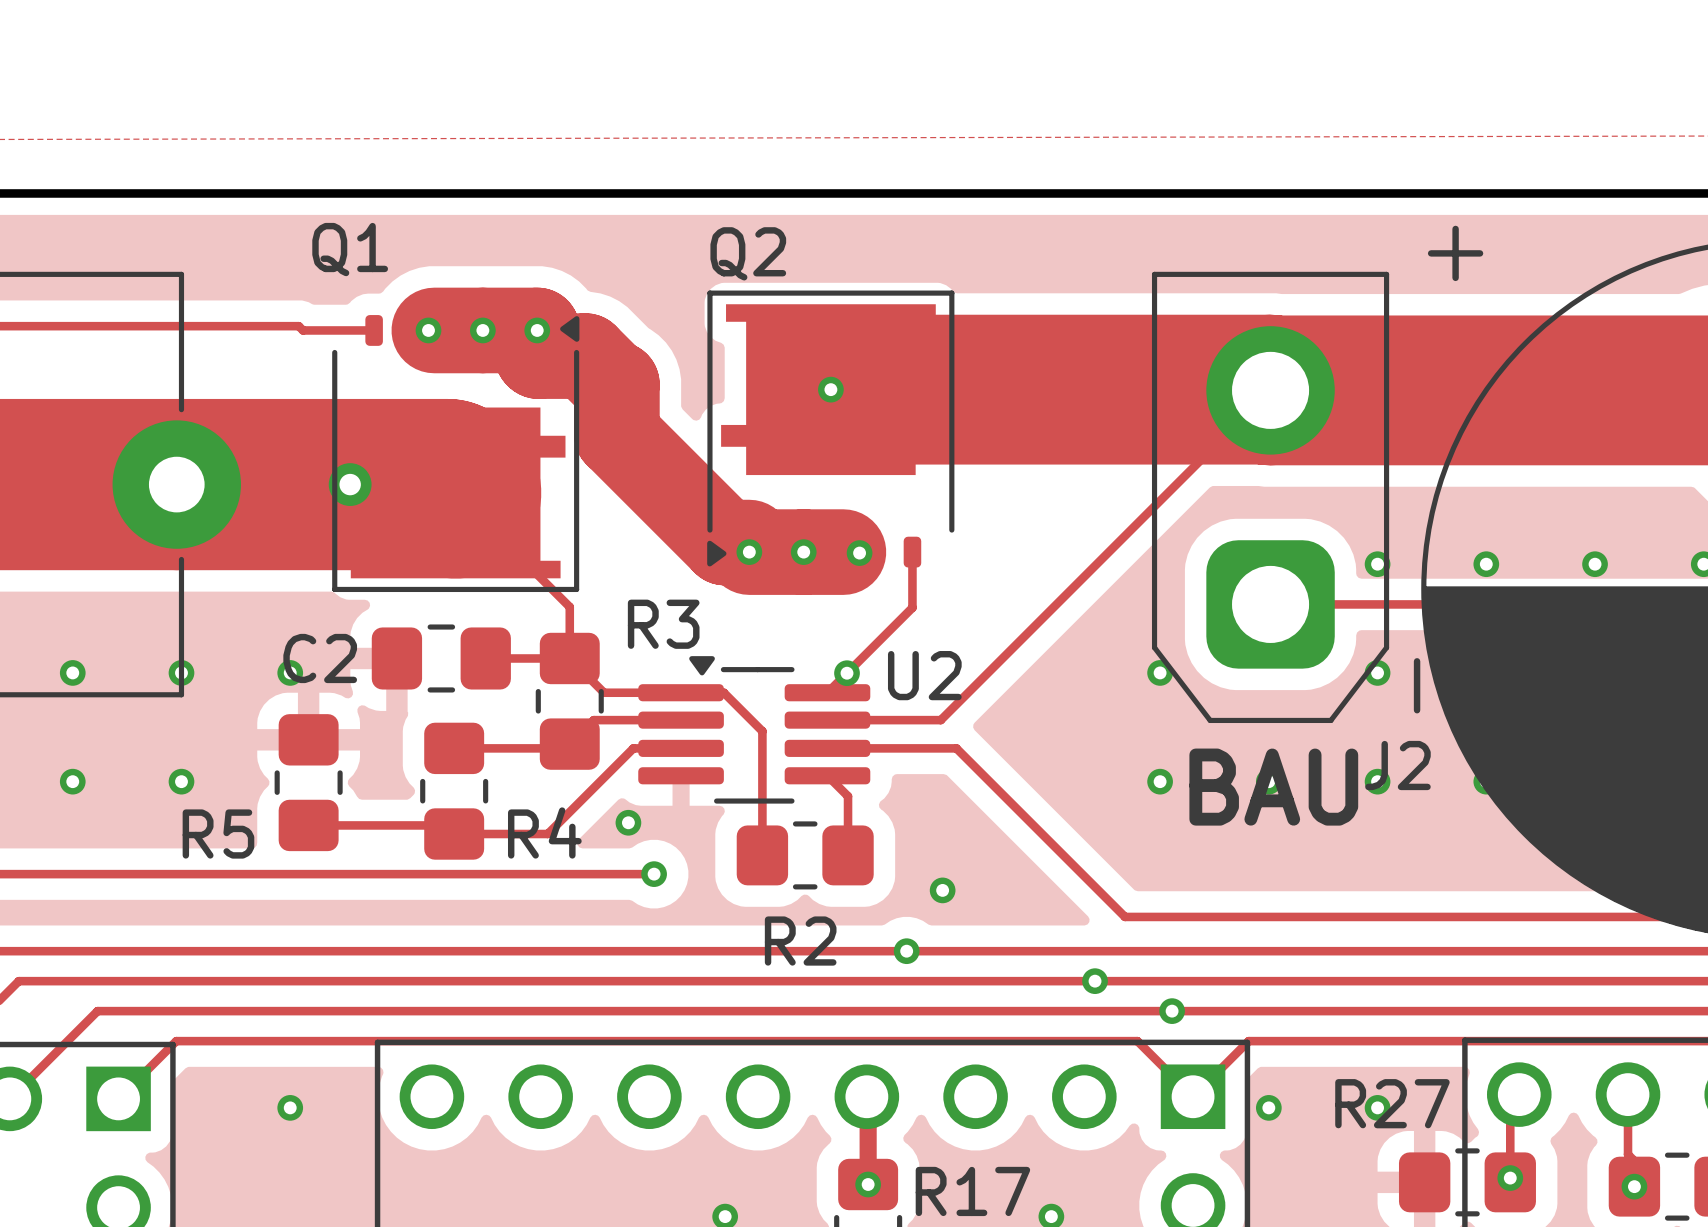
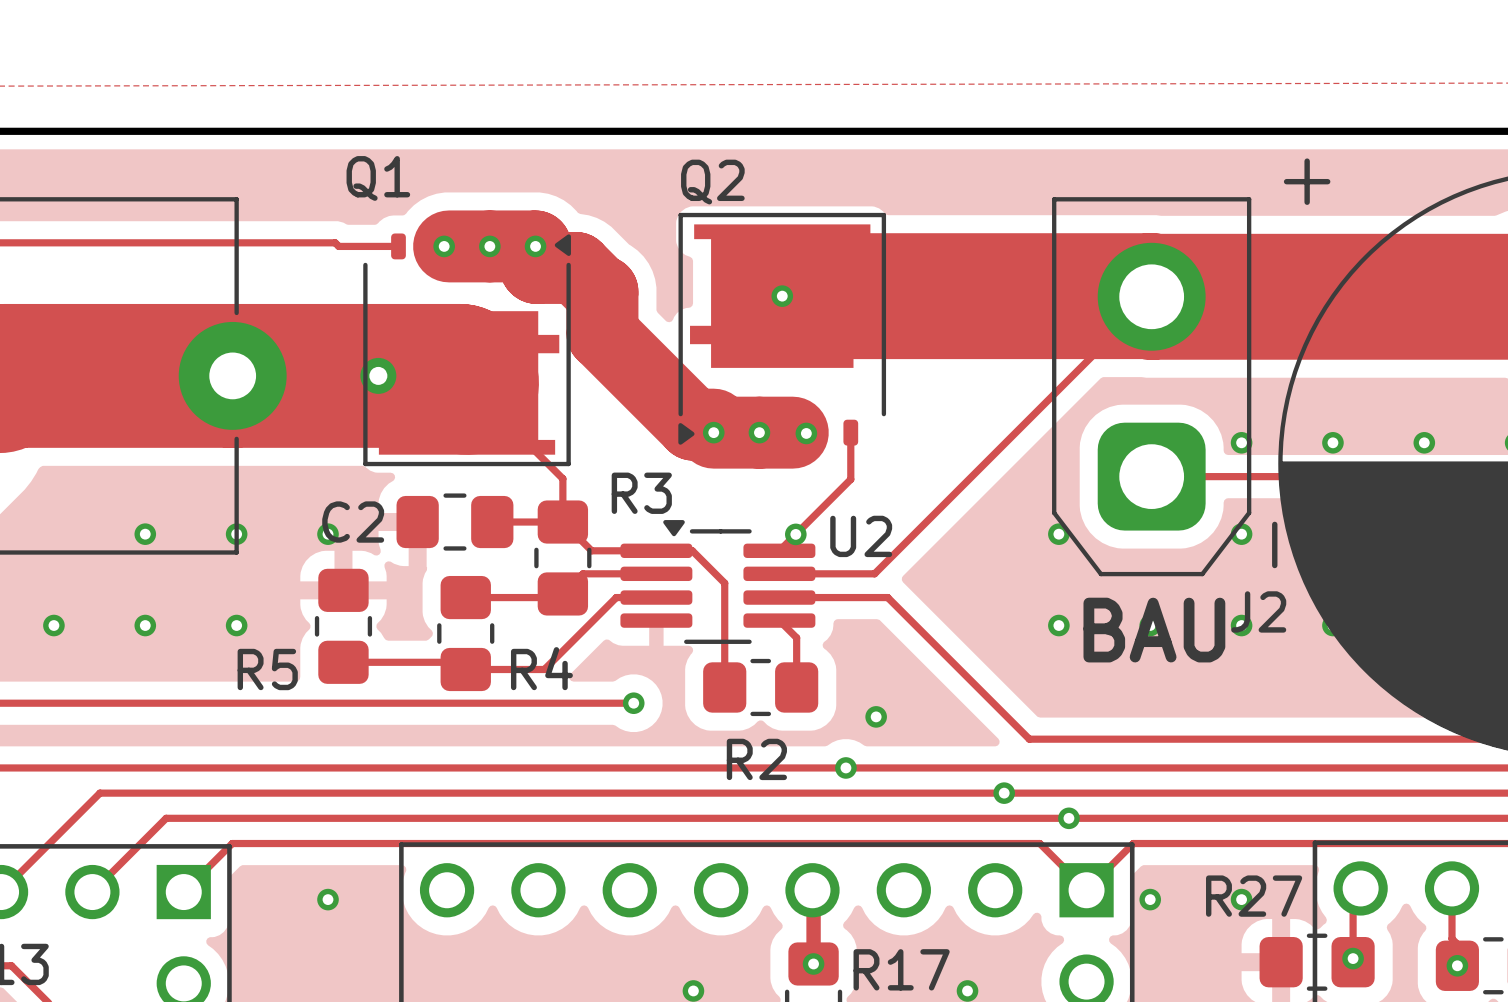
via: (628, 822) -> none

